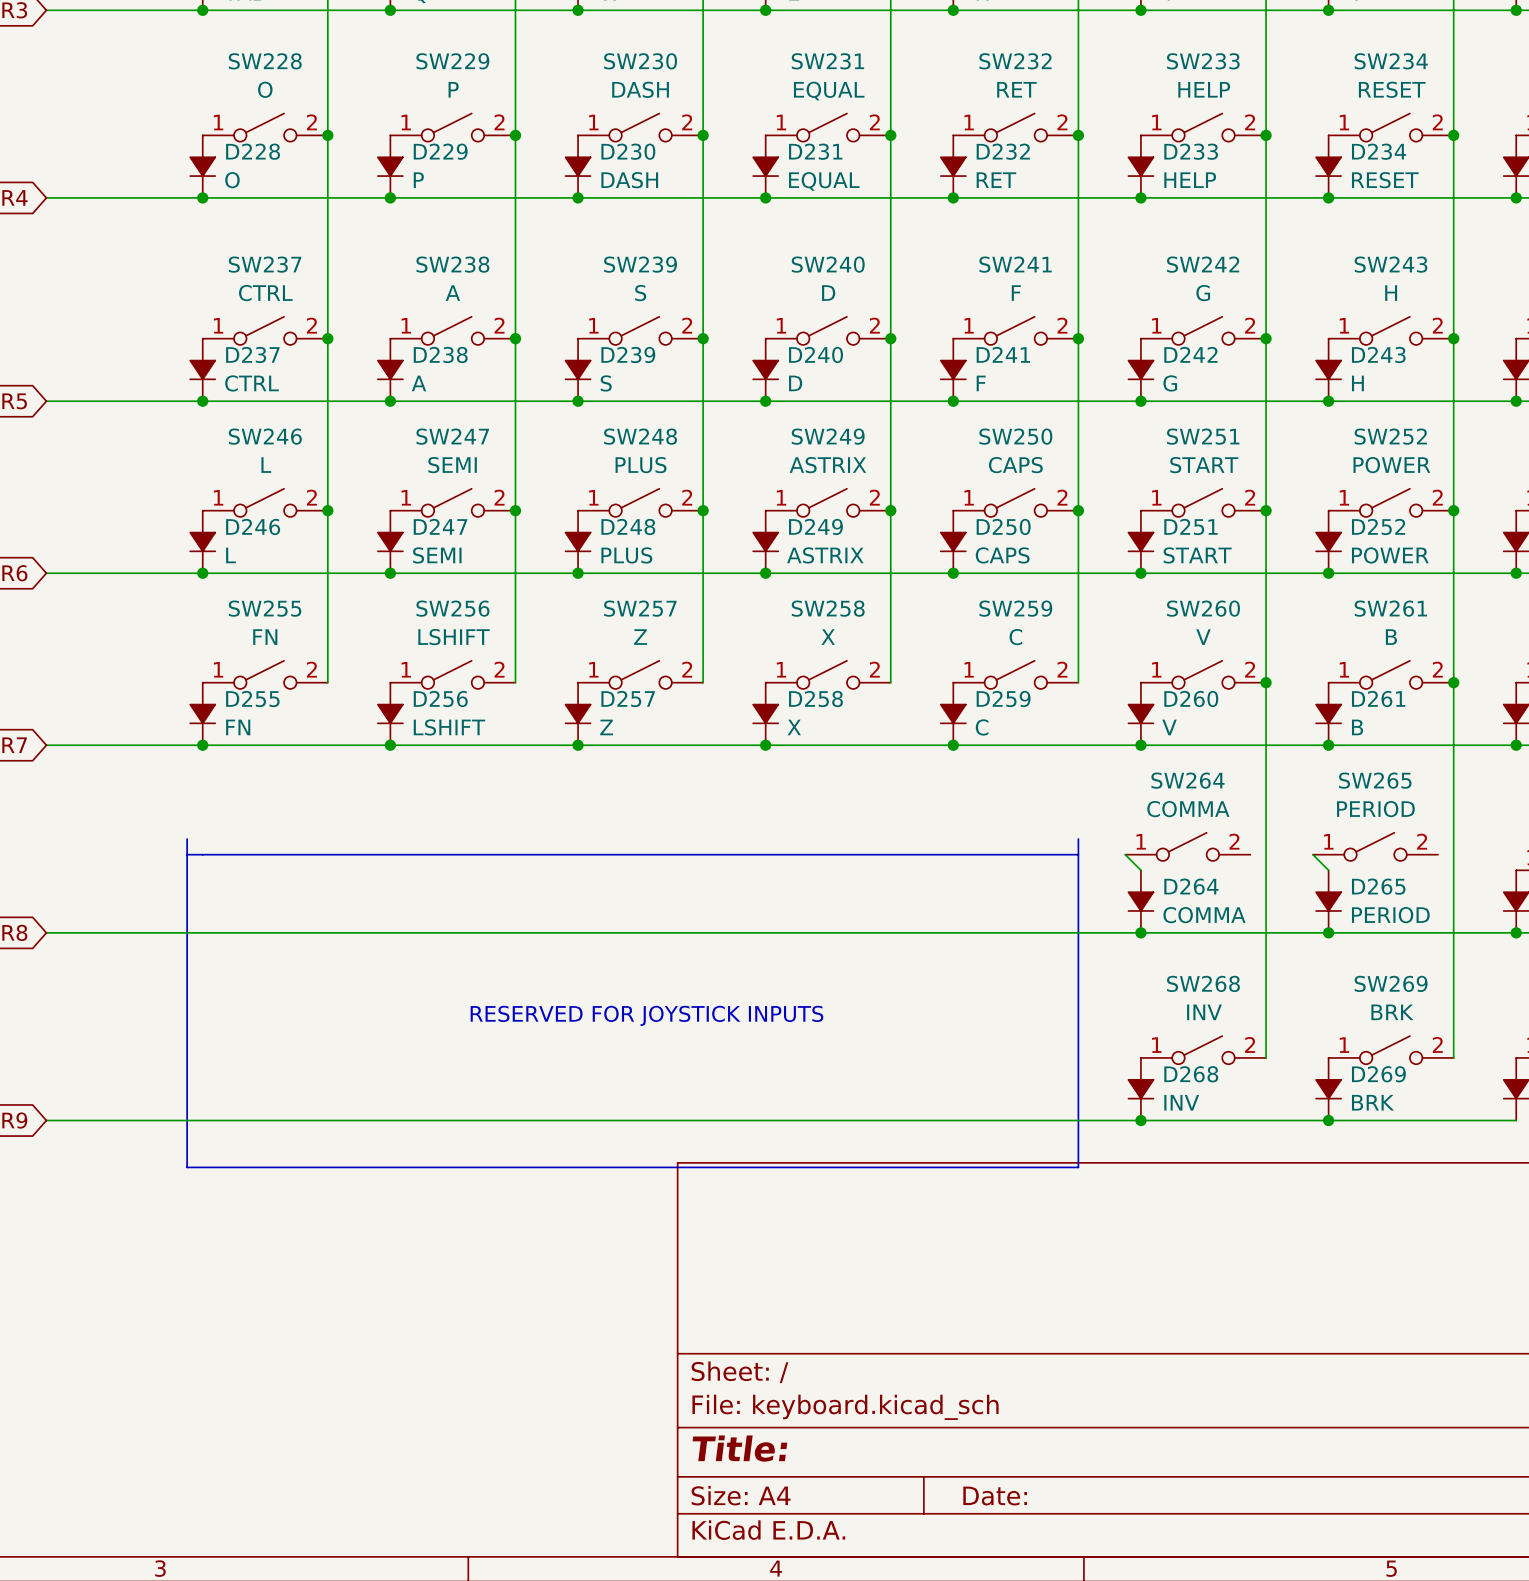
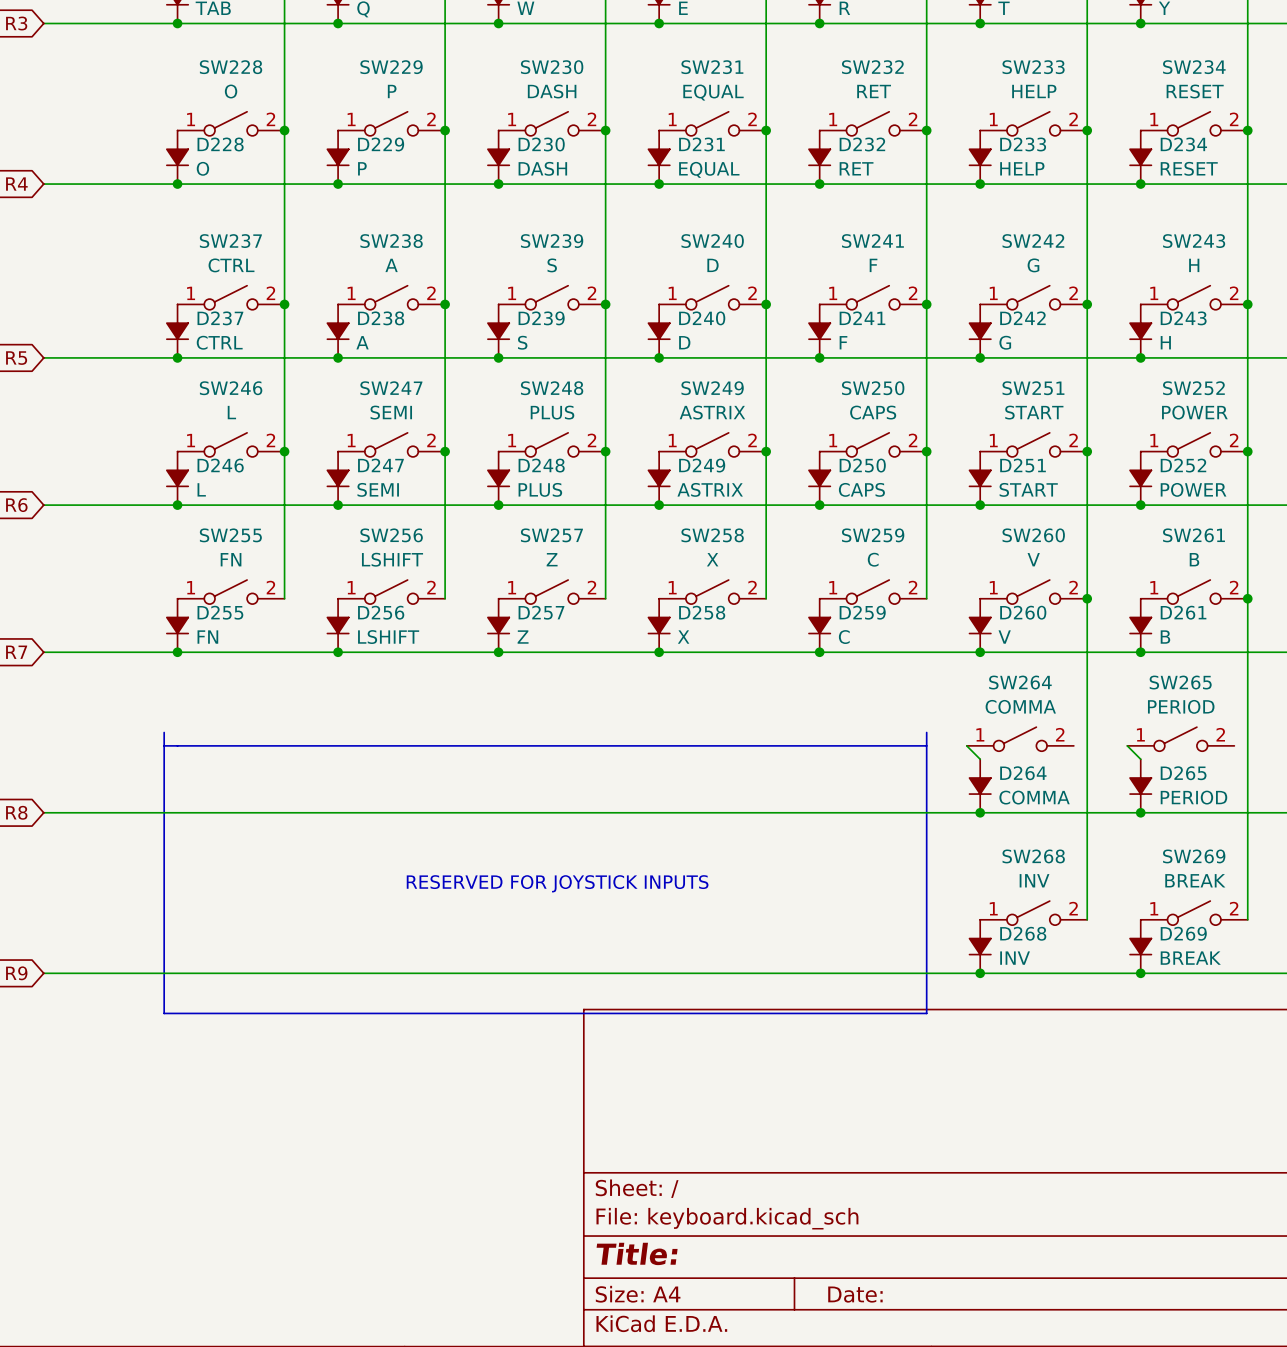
SW269 value: BRK (1392, 1012) -> BREAK (1195, 880)
D269 value: BRK (1372, 1102) -> BREAK (1190, 958)

